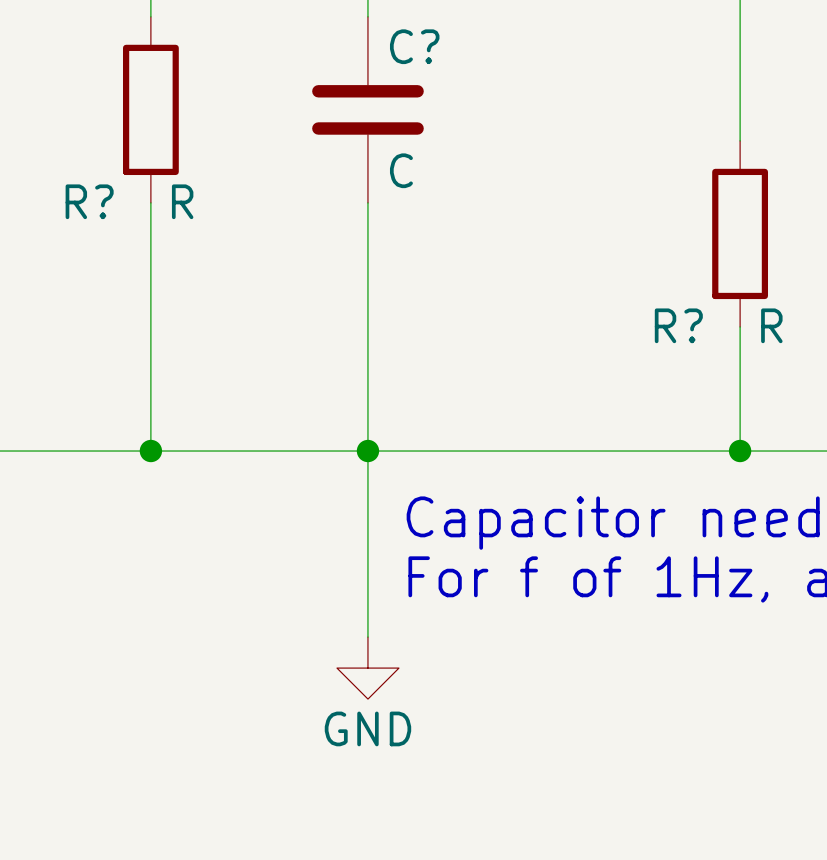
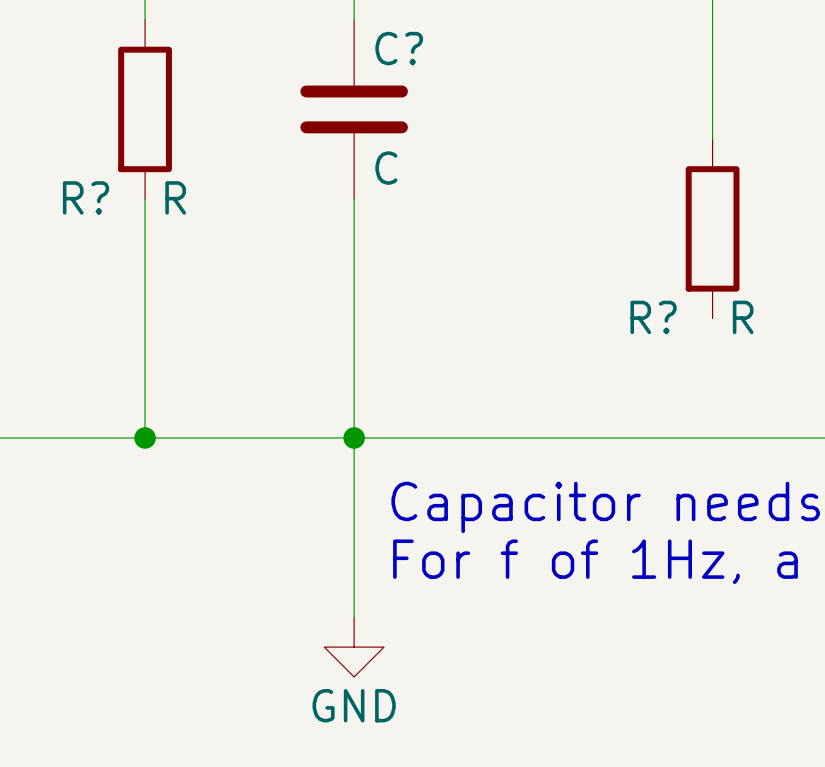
wire: (740, 326) (740, 451) -> none
junction: (740, 451) -> none

